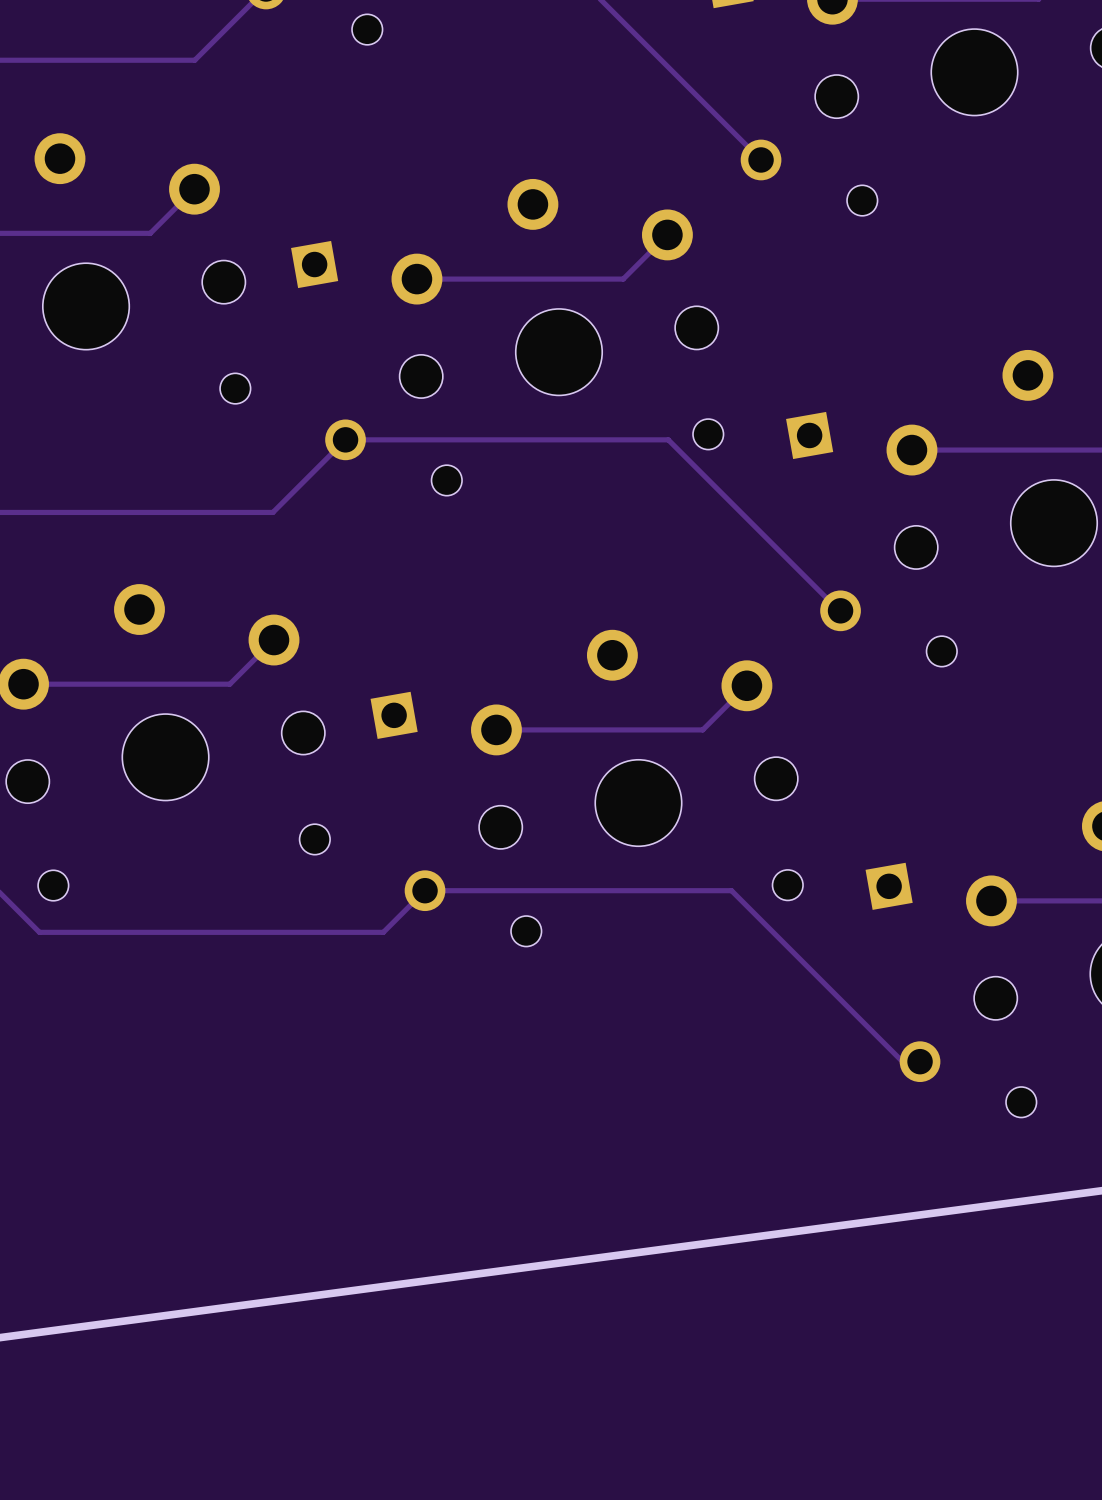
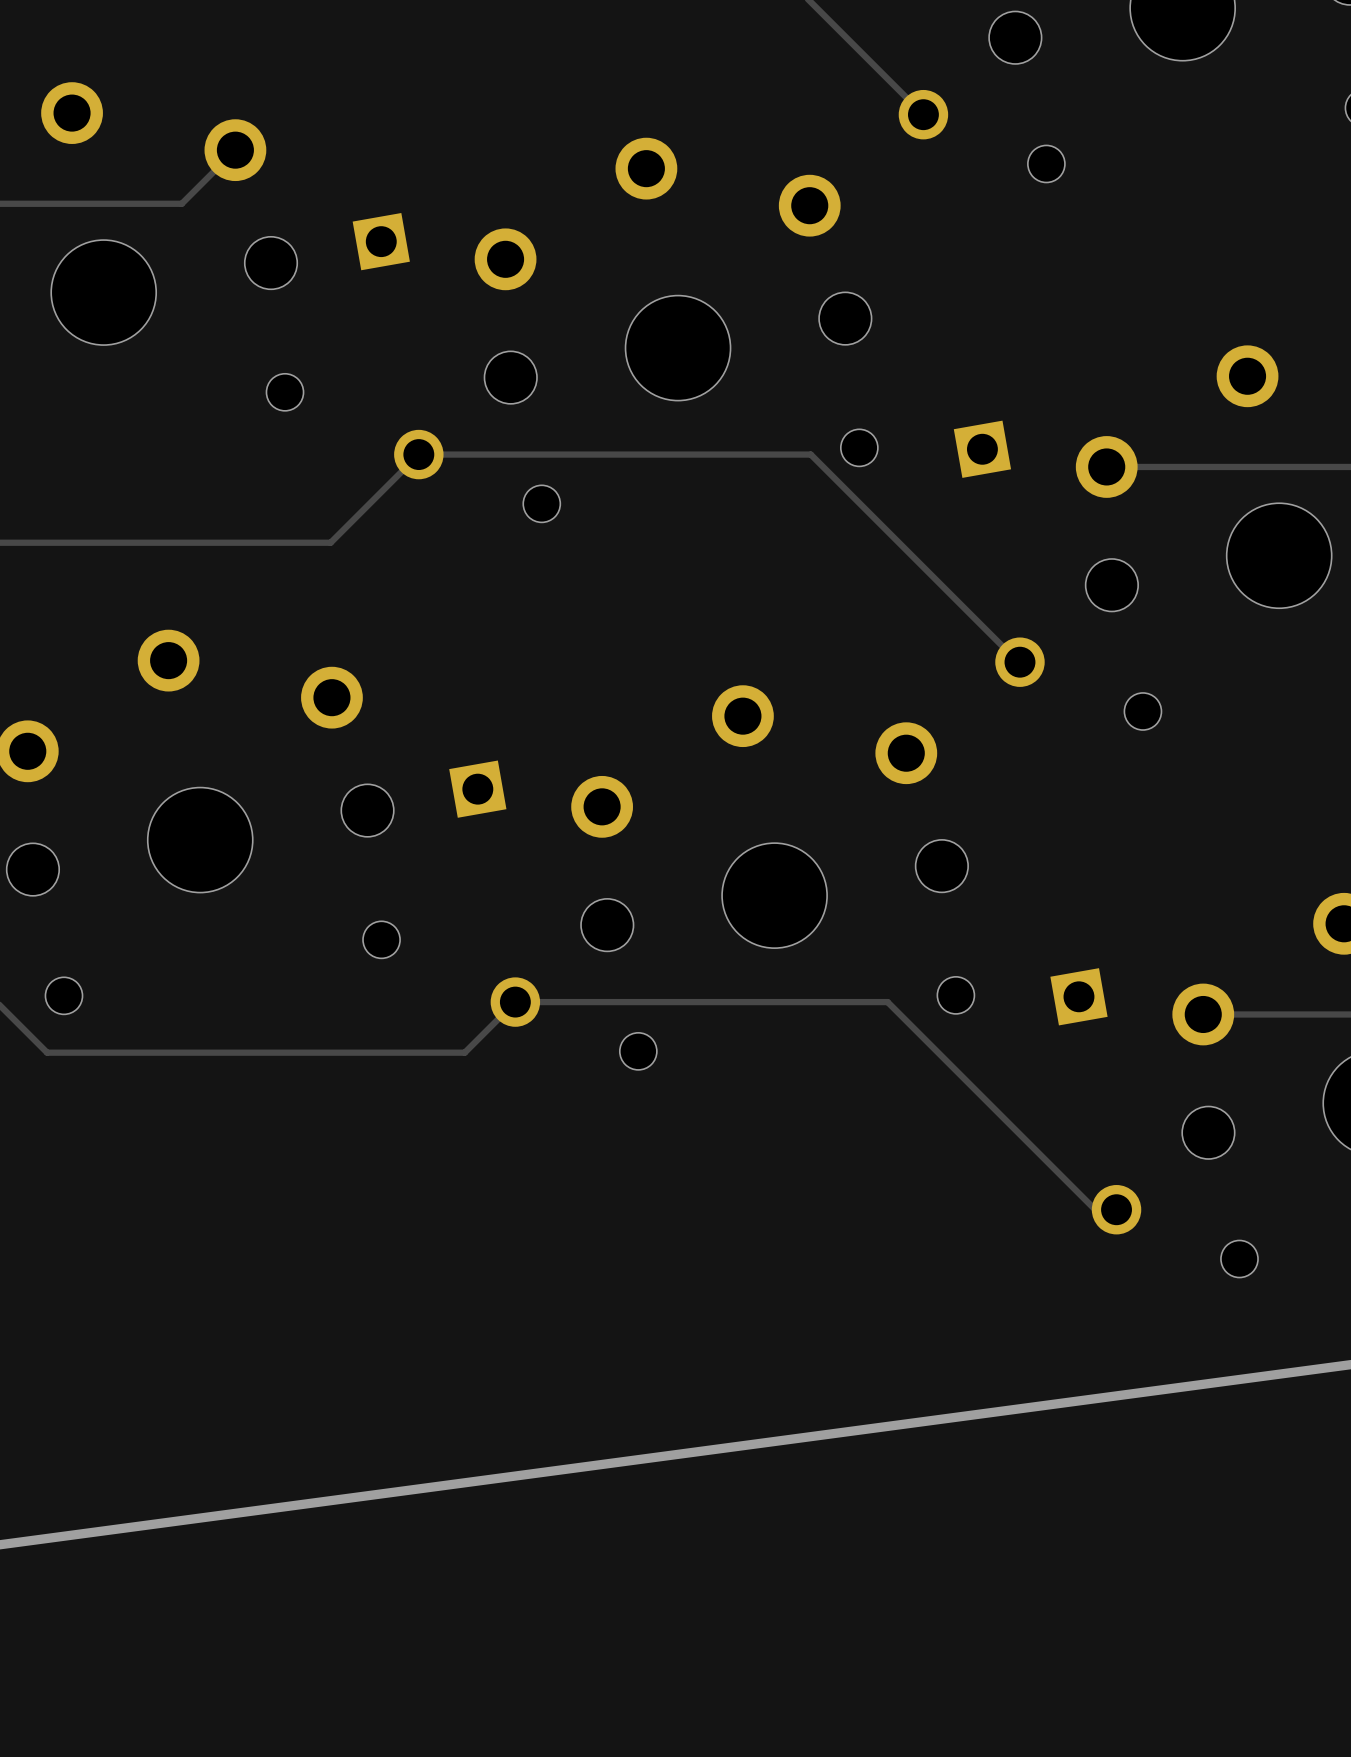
track: (667, 234) (623, 279) (416, 279) -> none
track: (274, 640) (229, 684) (23, 684) -> none
track: (746, 685) (702, 729) (496, 729) -> none

